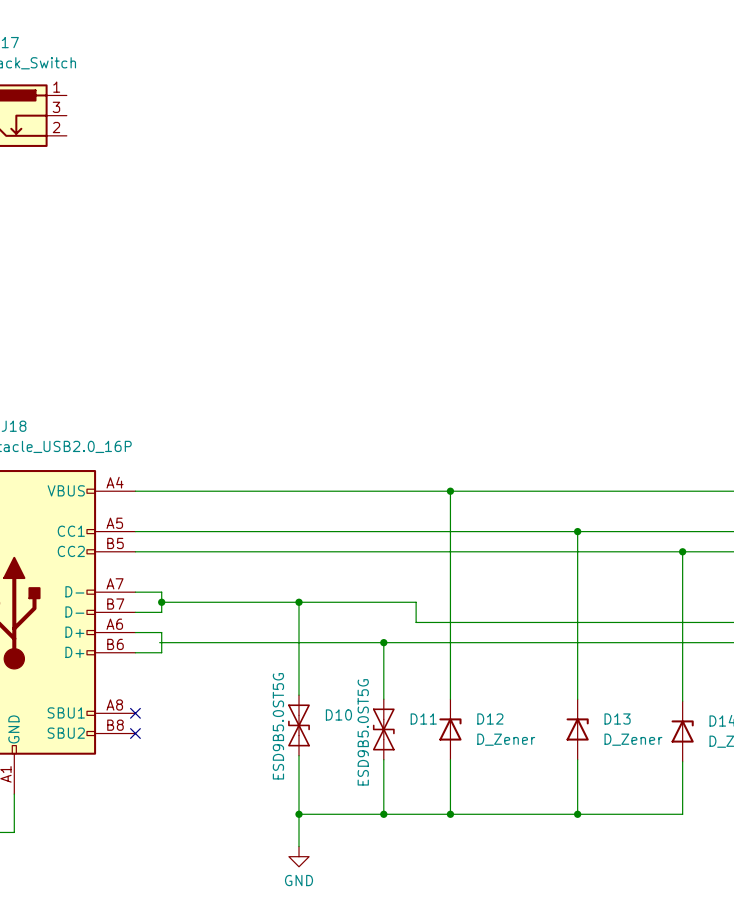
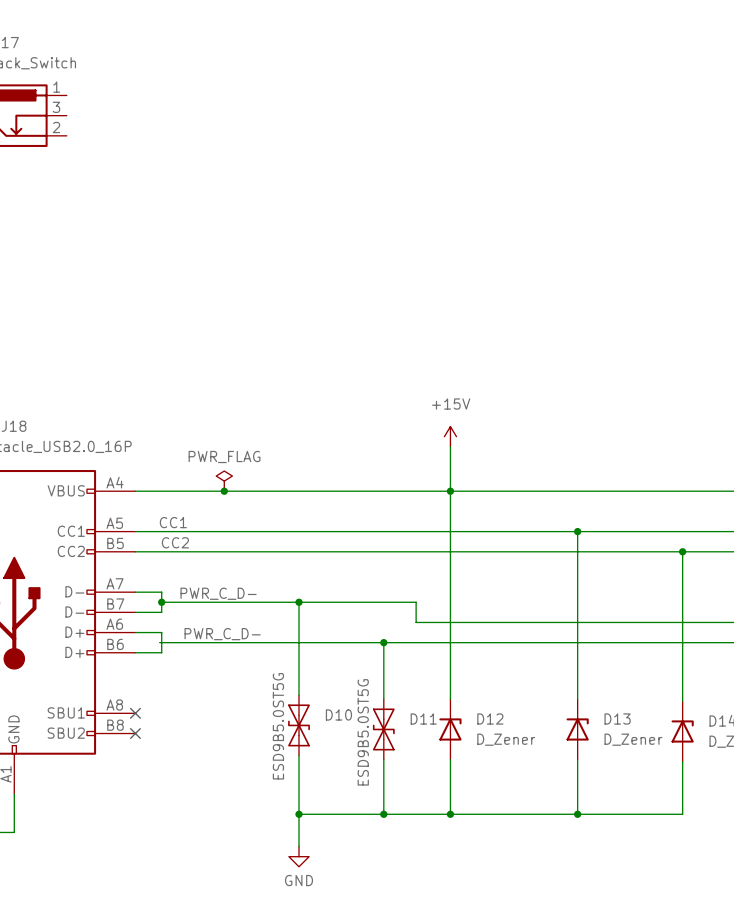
power symbol: none -> +15V (450, 436)
wire: none -> (450, 446) (450, 491)
power symbol: none -> PWR_FLAG (224, 481)
junction: none -> (224, 491)
label: none -> CC1 (173, 522)
label: none -> CC2 (175, 542)
label: none -> PWR_C_D- (218, 593)
label: none -> PWR_C_D- (222, 634)

